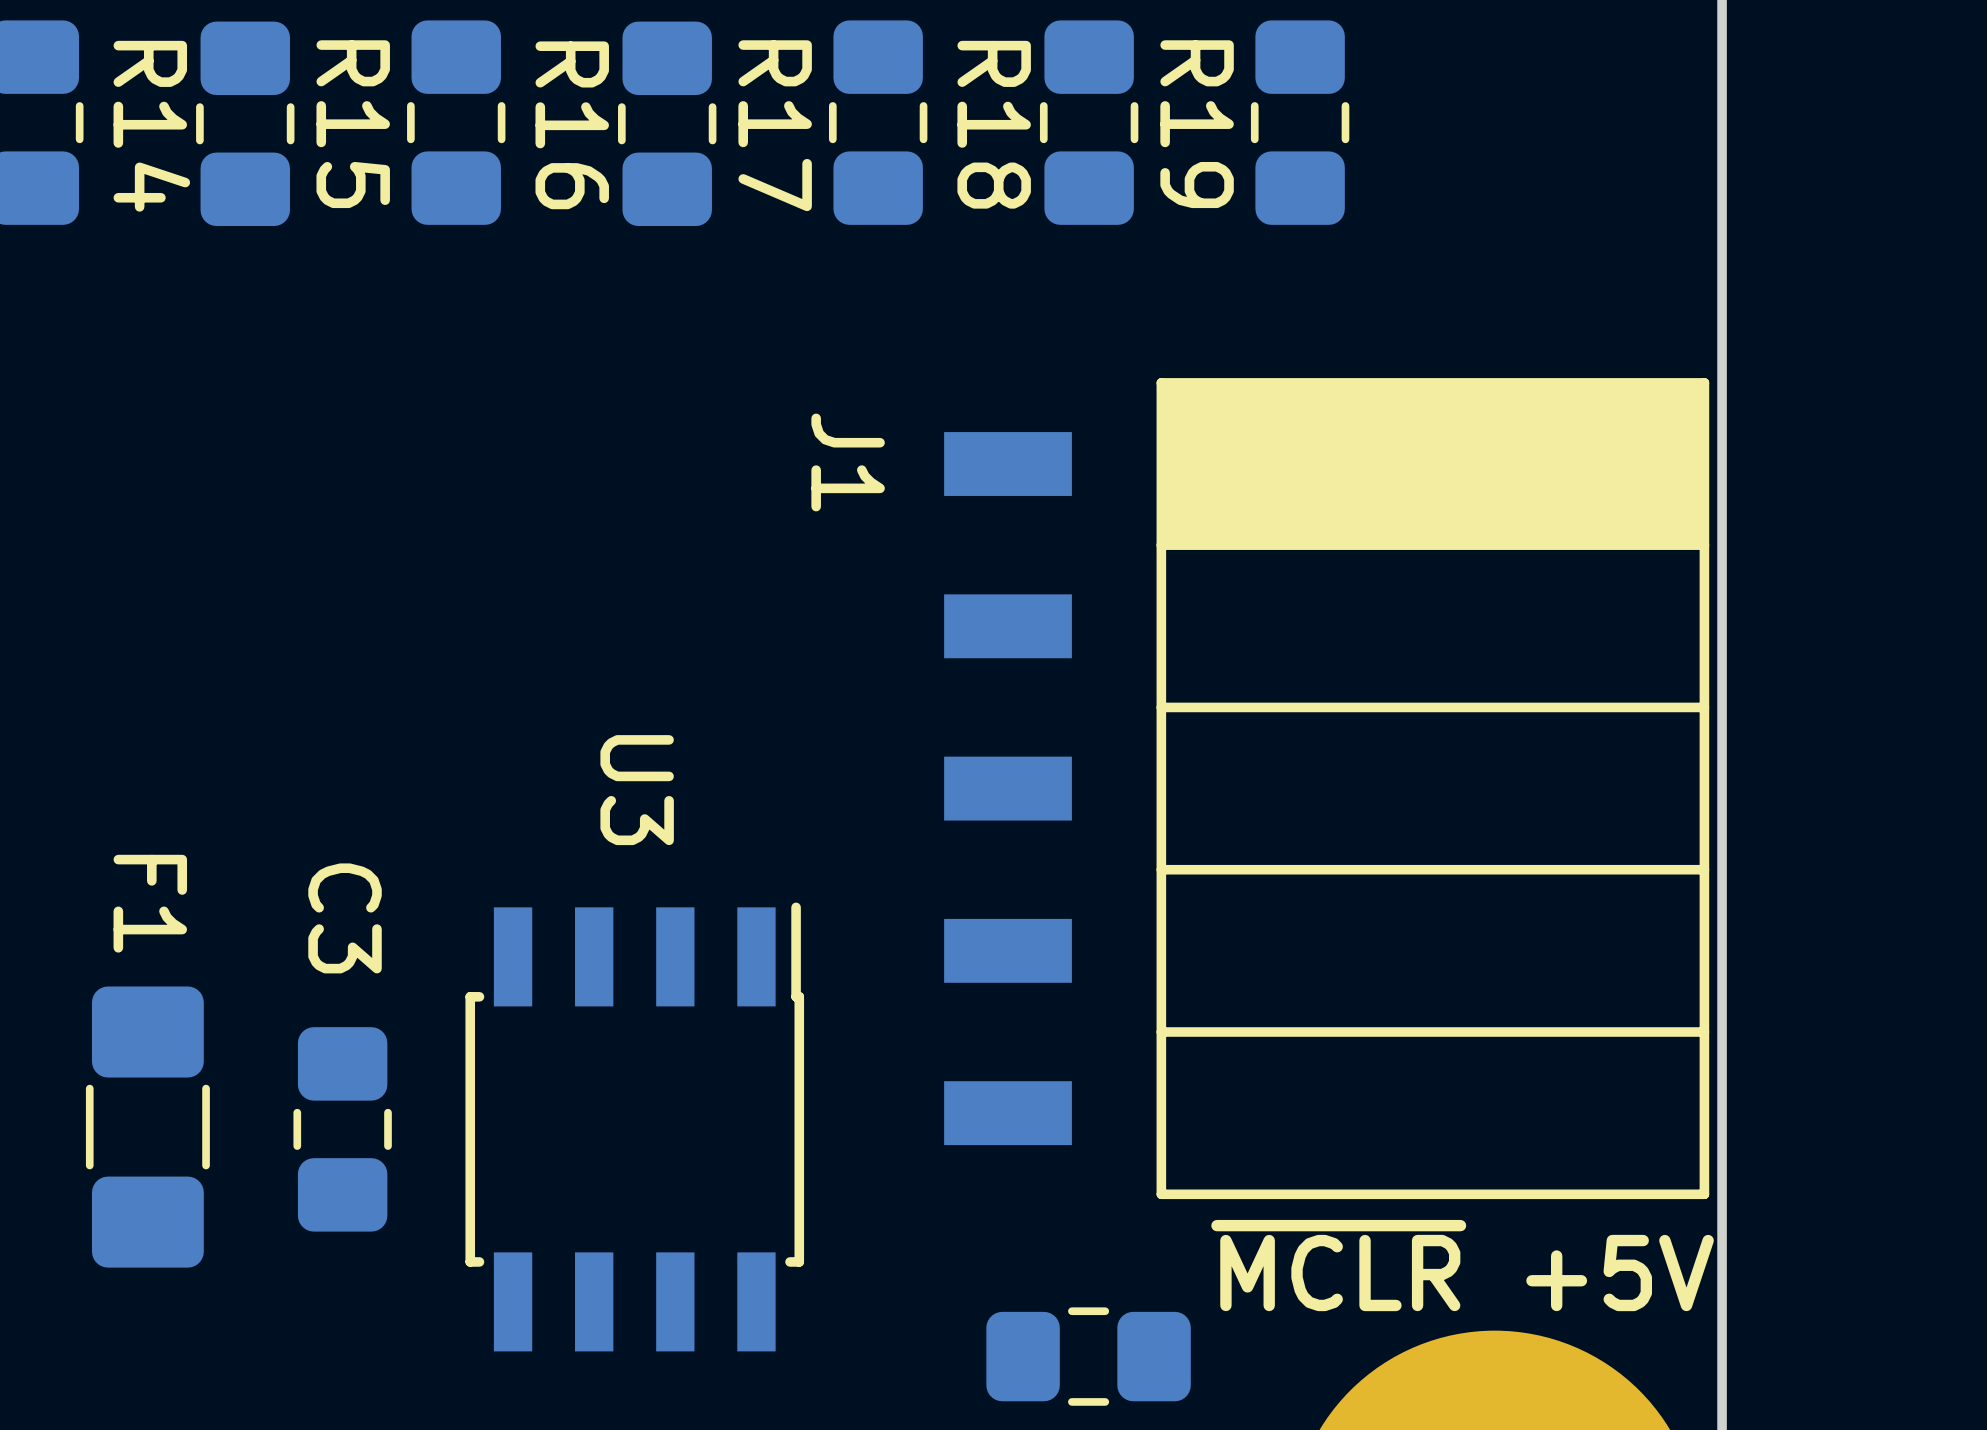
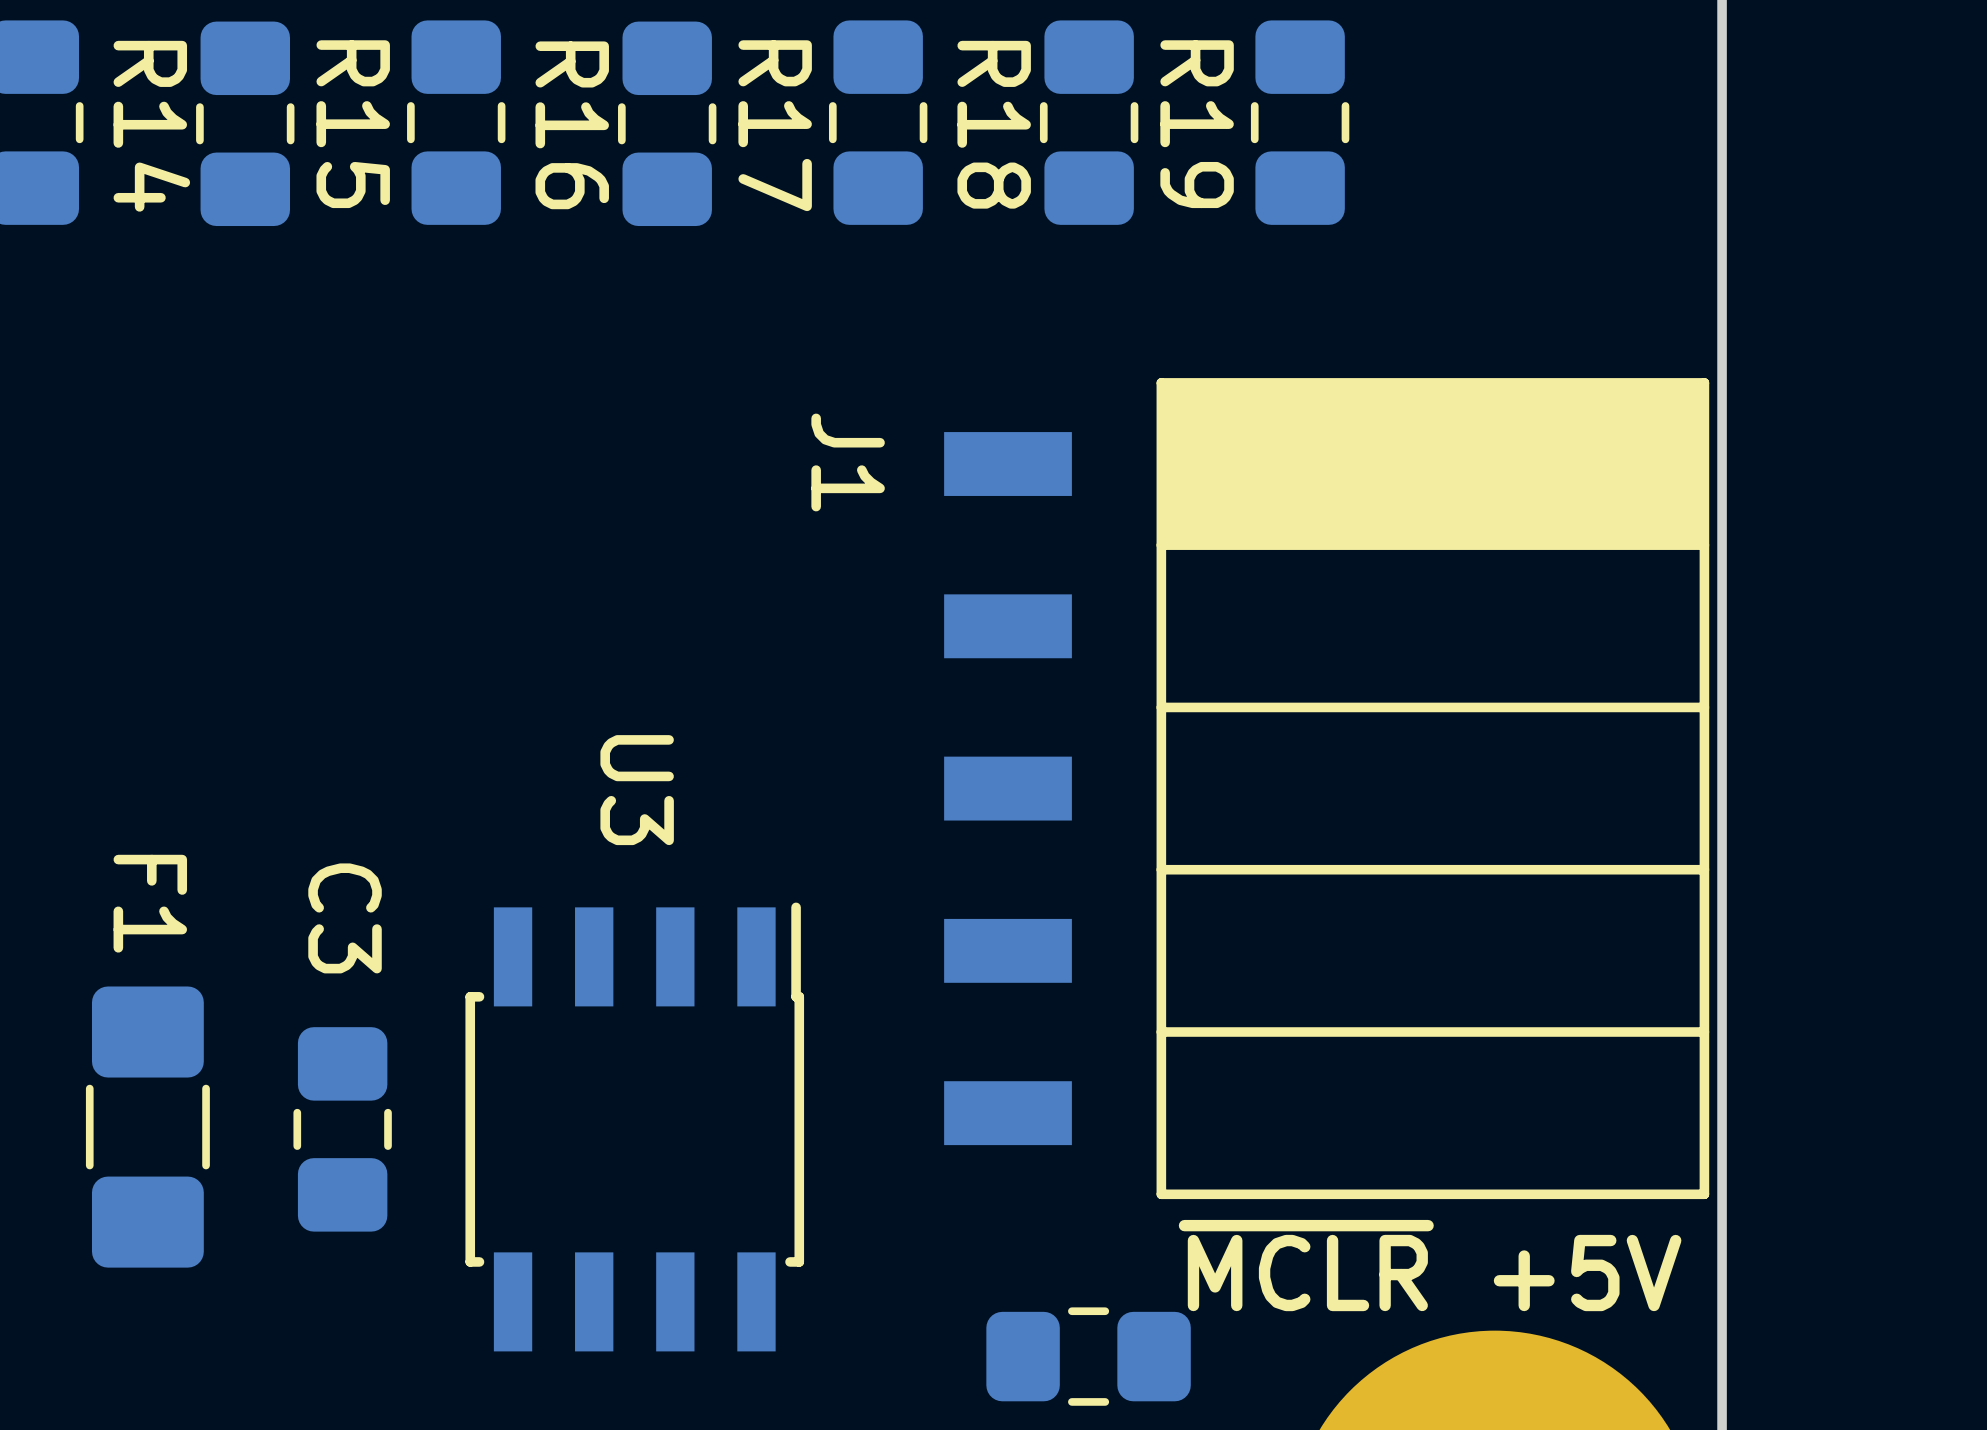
text position: ~{MCLR} +5V (1462, 1265) -> ~{MCLR} +5V (1430, 1265)

